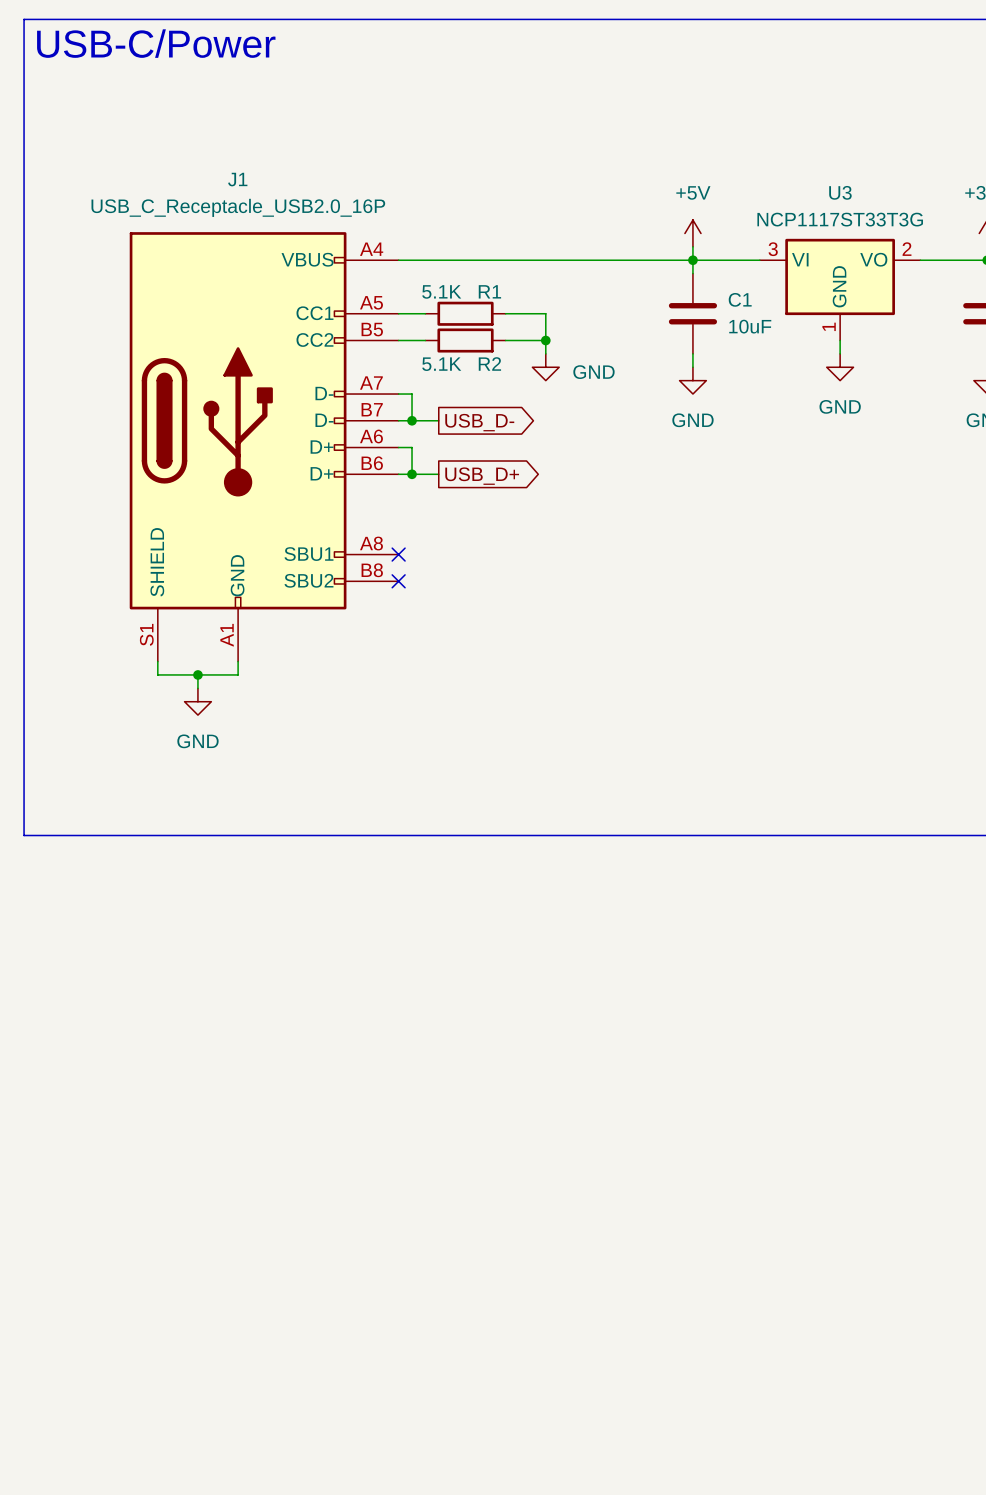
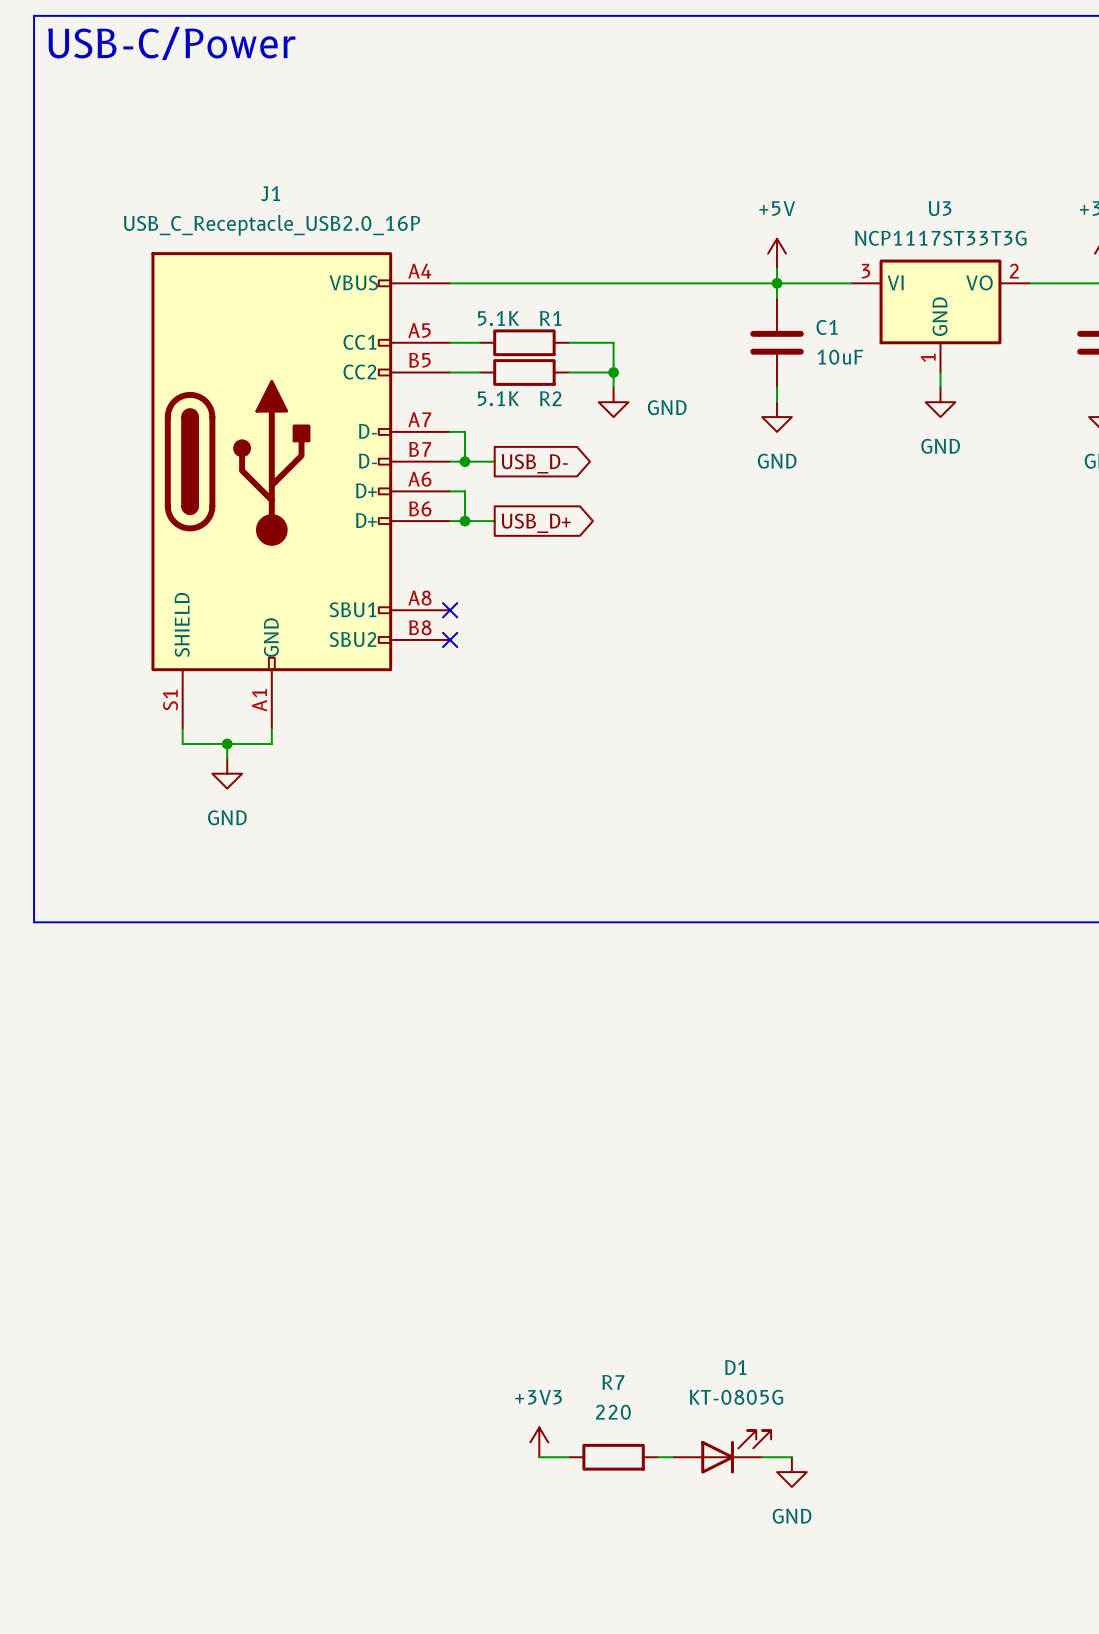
power symbol: none -> +3V3 (539, 1442)
D1: none -> KT-0805G (722, 1452)
wire: none -> (539, 1457) (569, 1457)
R7: none -> 220 (613, 1457)
wire: none -> (658, 1457) (673, 1457)
wire: none -> (762, 1457) (791, 1457)
power symbol: none -> GND (791, 1472)

